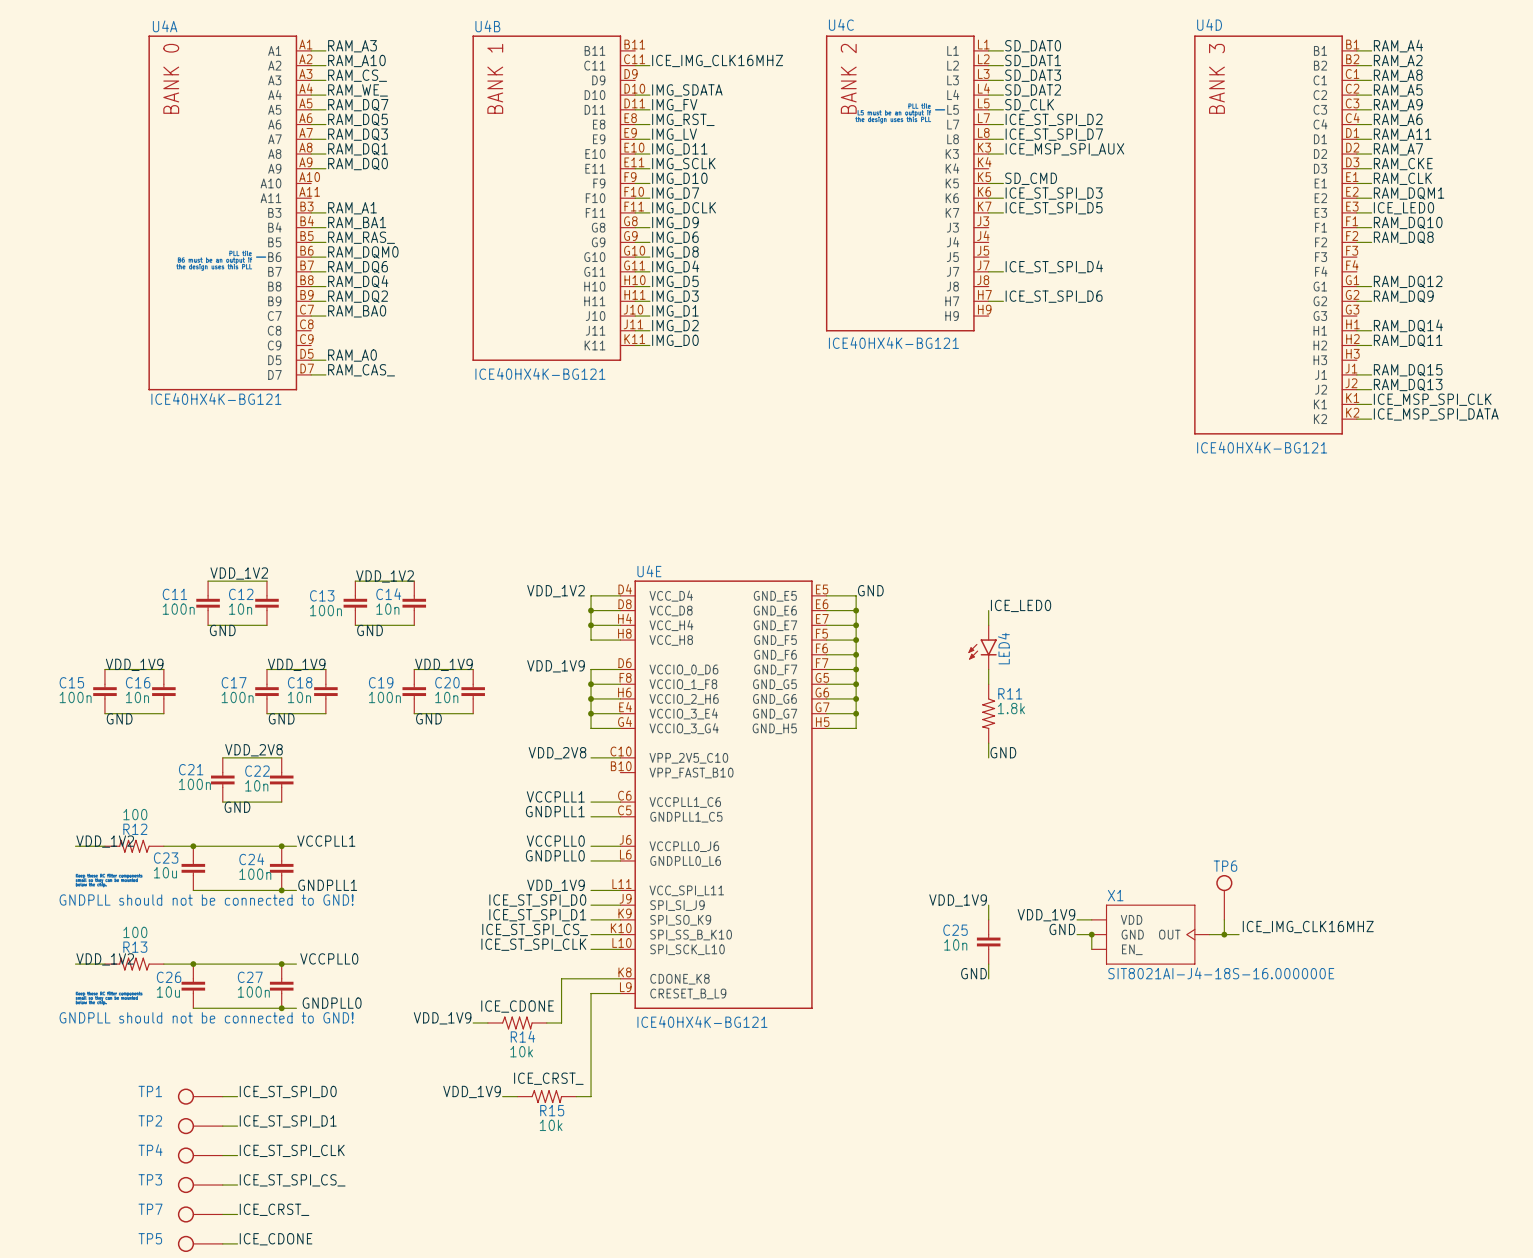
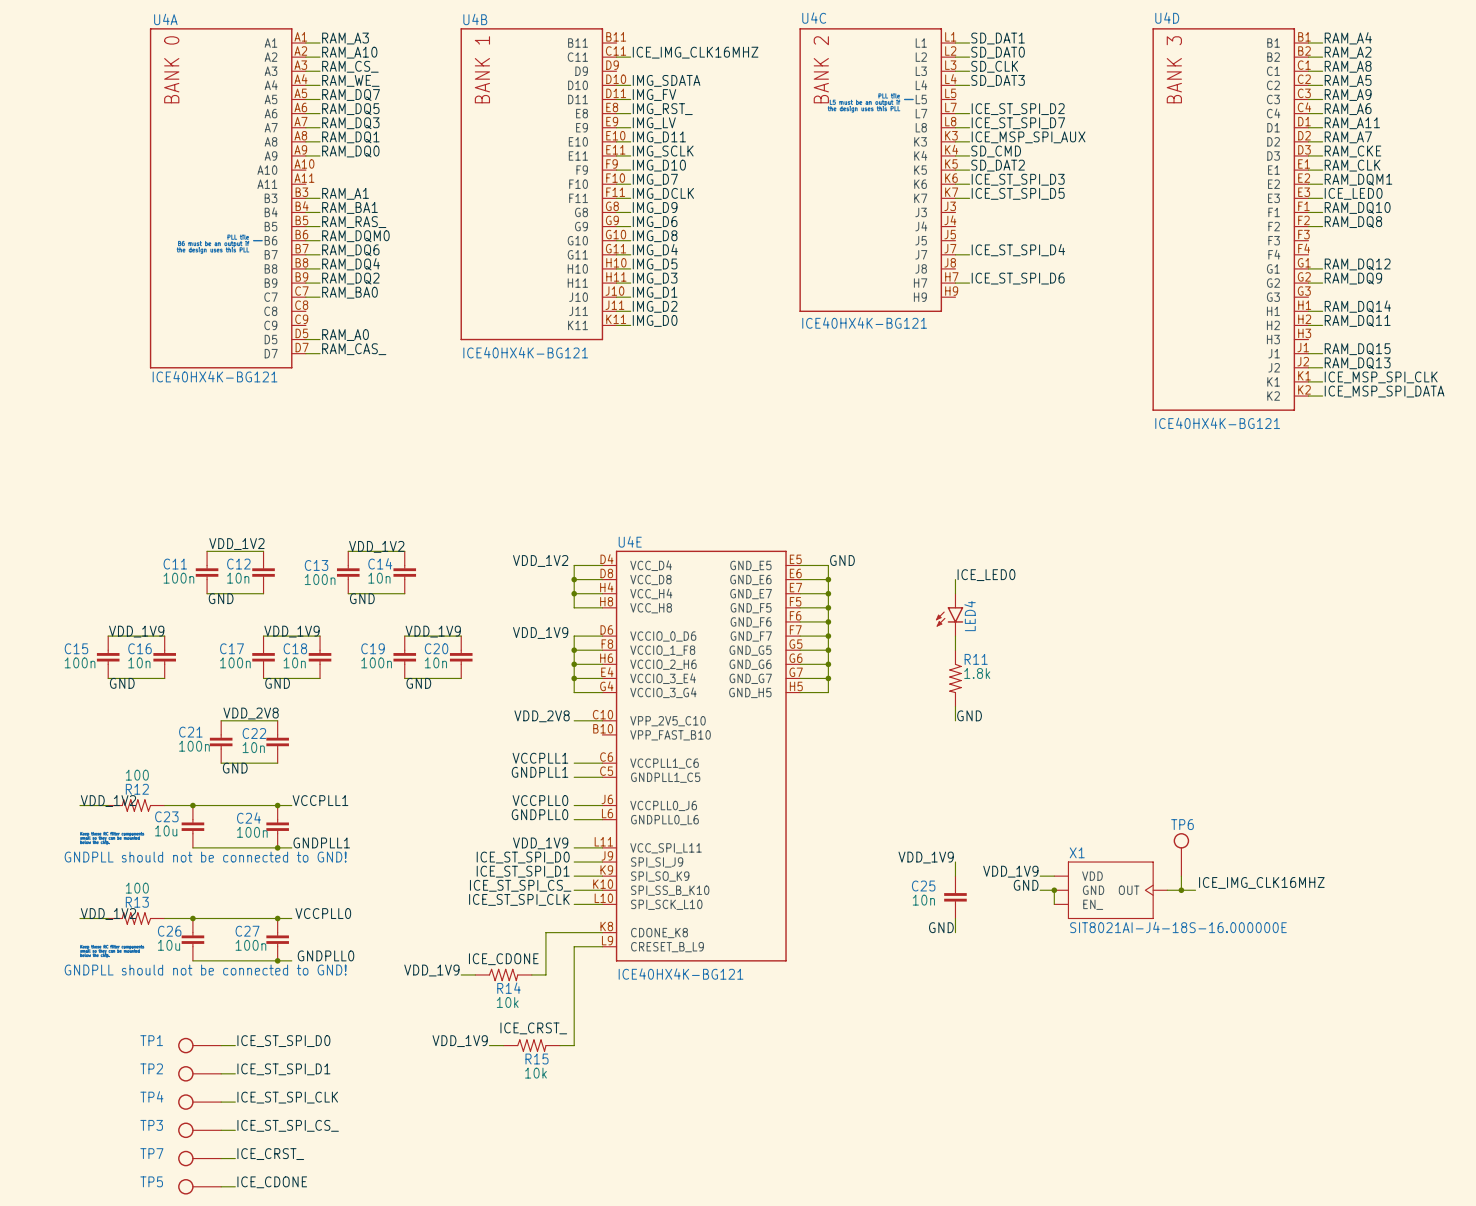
label: SD_DAT0 (1033, 46) -> SD_DAT1 (998, 38)
label: SD_DAT1 (1033, 60) -> SD_DAT0 (998, 52)
label: SD_DAT3 (1033, 75) -> SD_CLK (994, 66)
label: SD_DAT2 (1033, 90) -> SD_DAT3 (998, 80)
label: SD_CLK (1029, 105) -> none
wire: (988, 109) (1003, 109) -> (955, 155) (969, 155)
label: none -> SD_CMD (996, 151)
label: SD_CMD (1031, 178) -> SD_DAT2 (998, 165)

